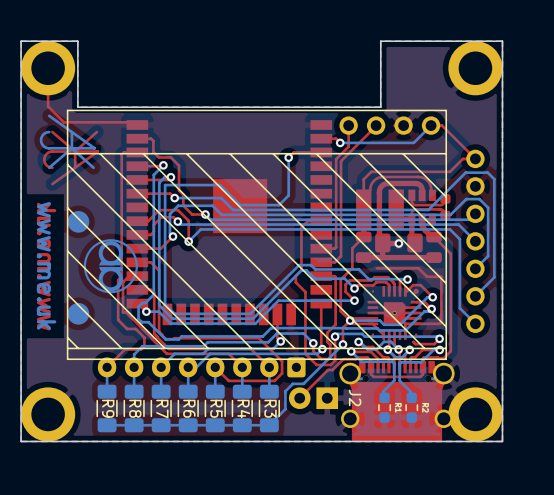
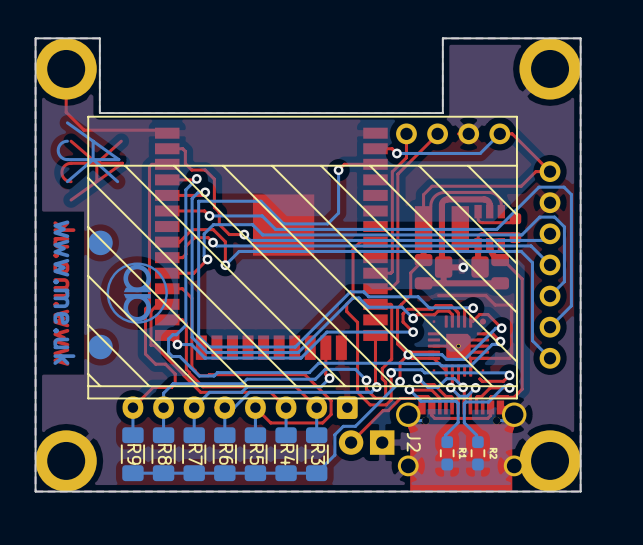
part footprint: [355, 175, 451, 263] -> [414, 190, 522, 290]

